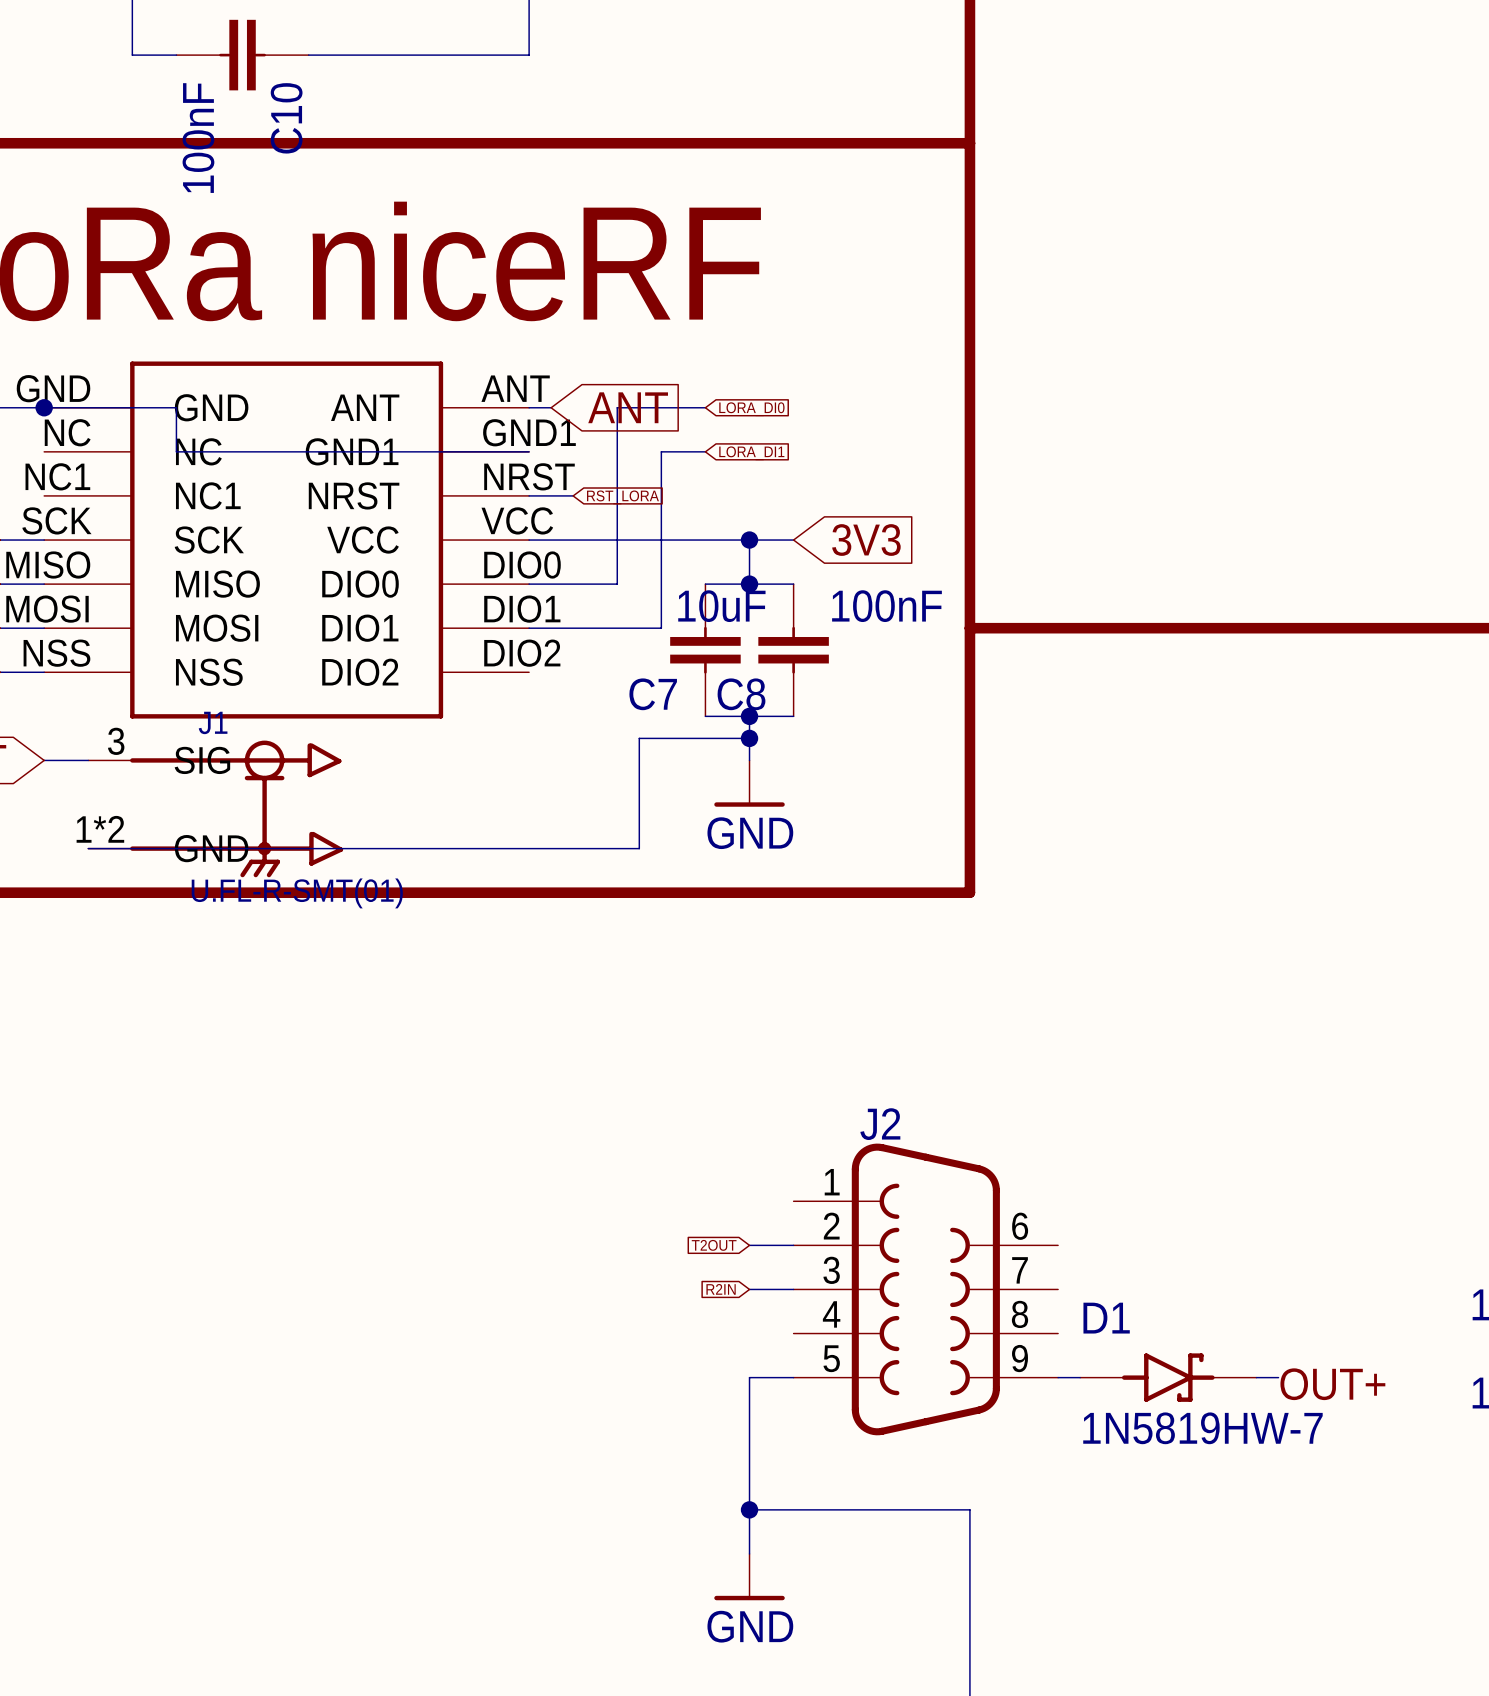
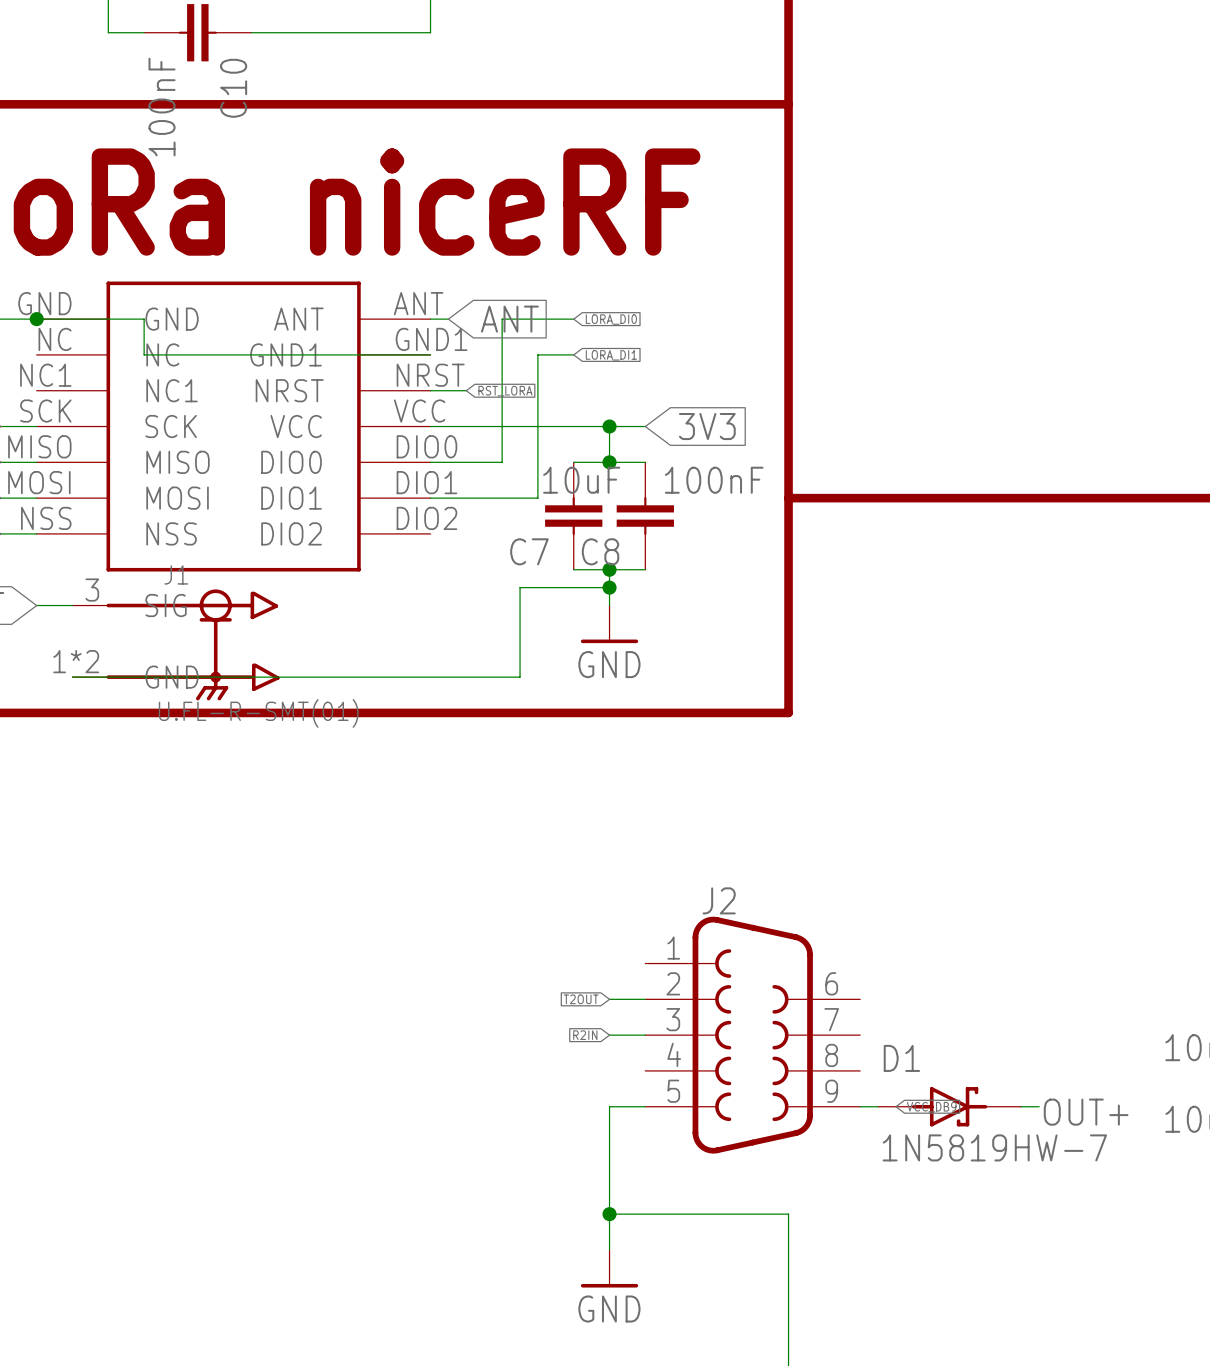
global label: none -> VCC_DB9 (931, 1107)

